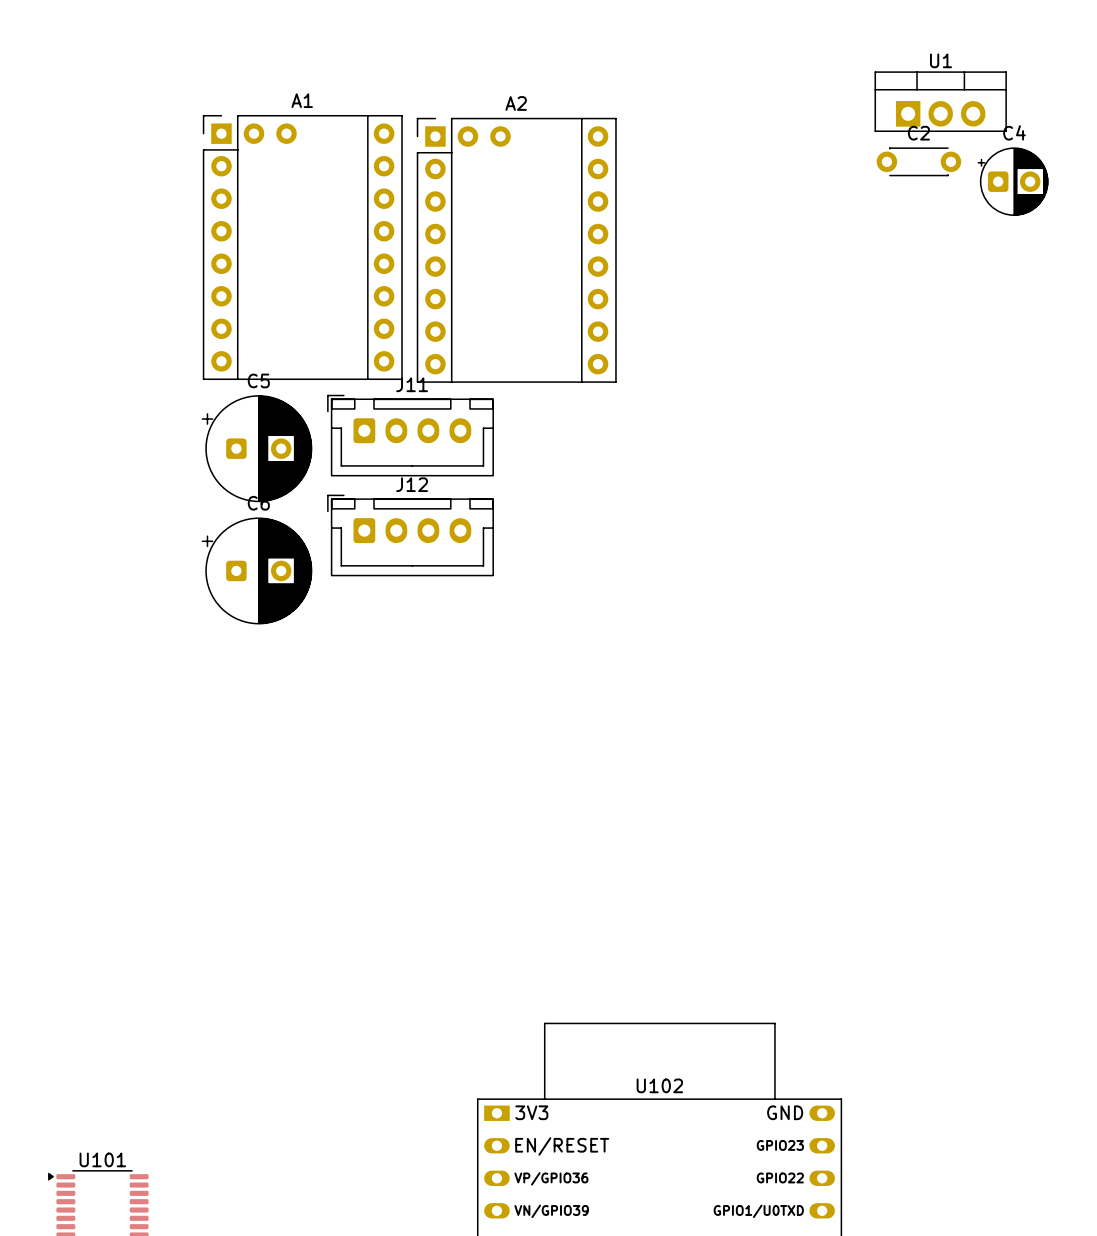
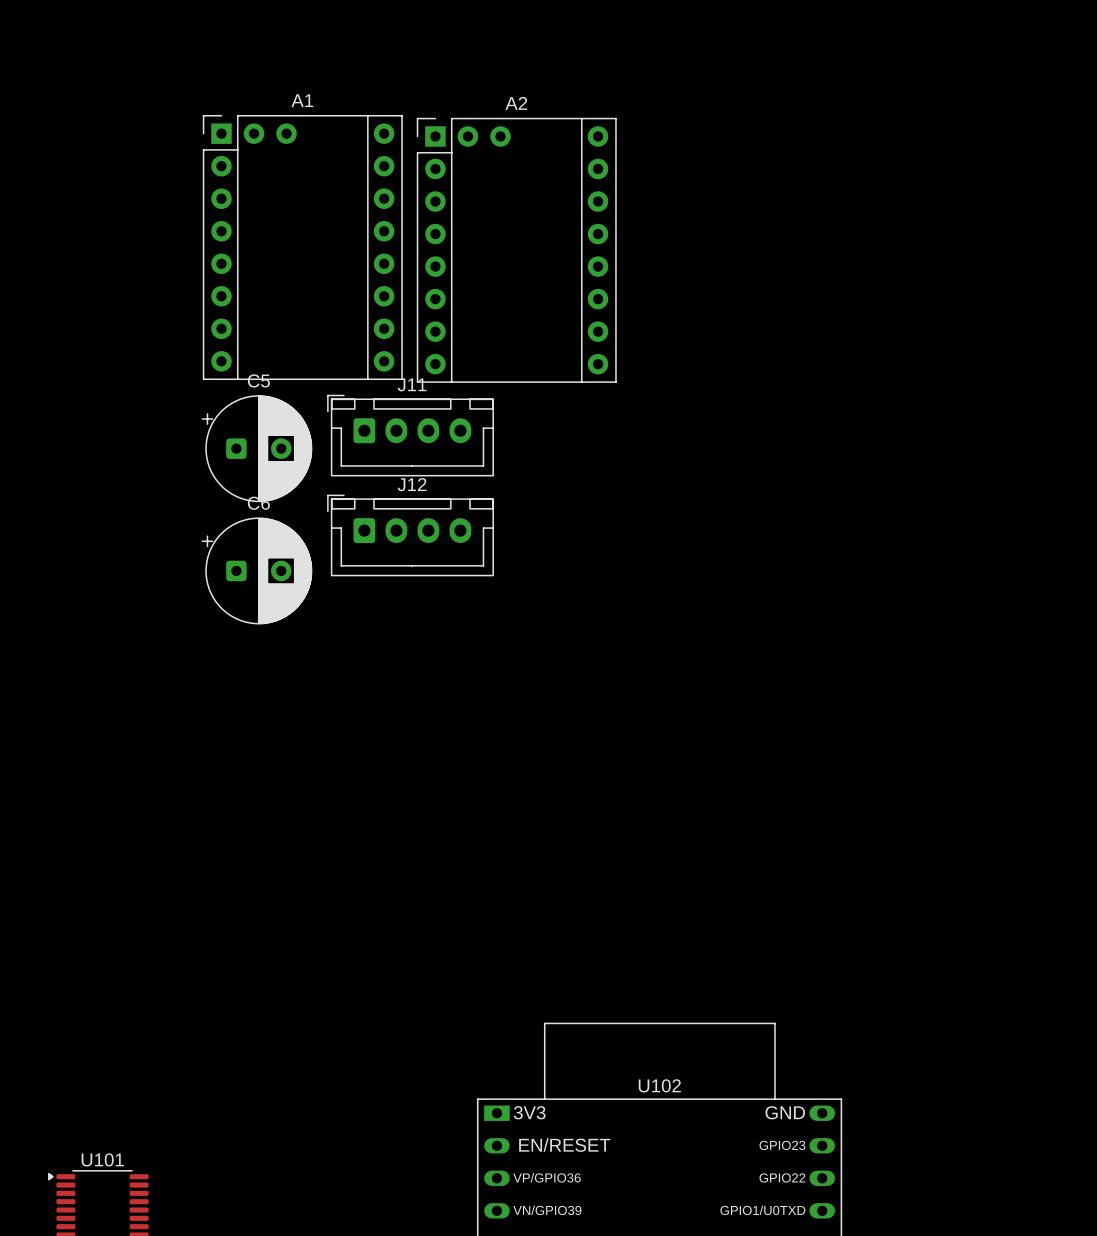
U1: (940, 101) -> none
C2: (918, 161) -> none
C4: (1013, 181) -> none

